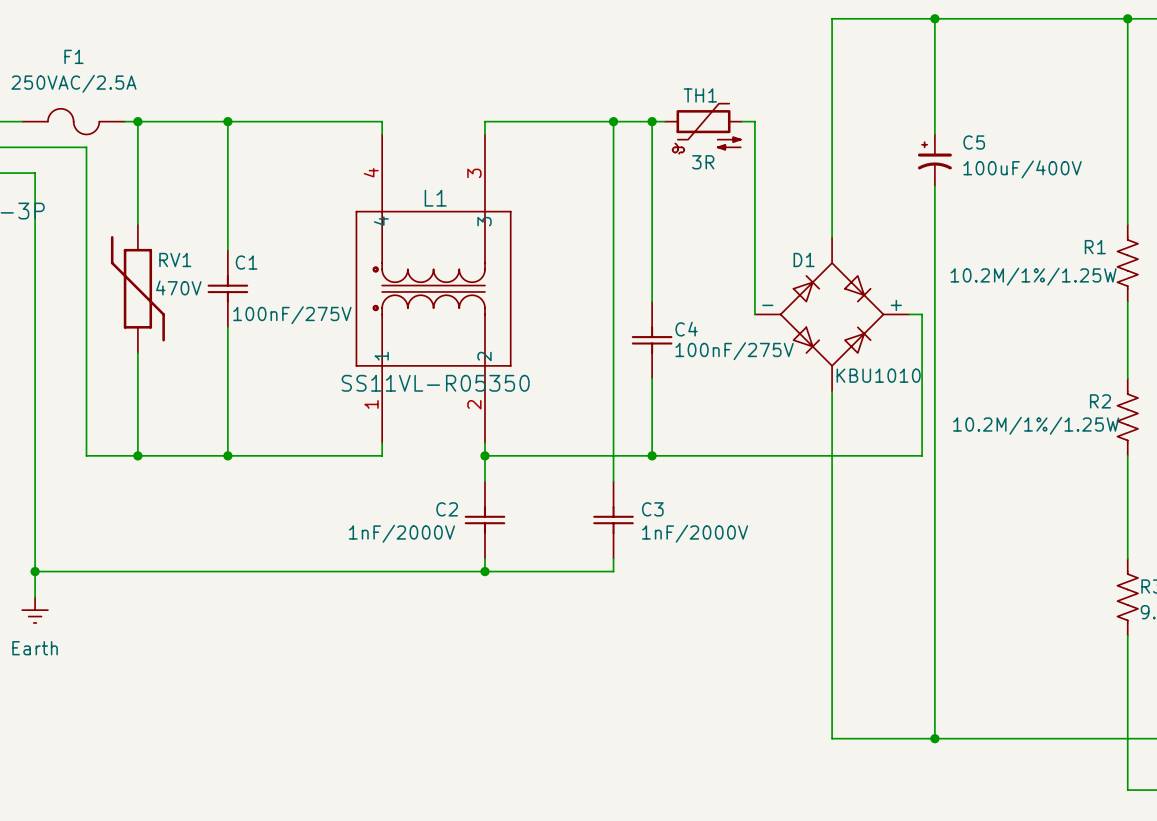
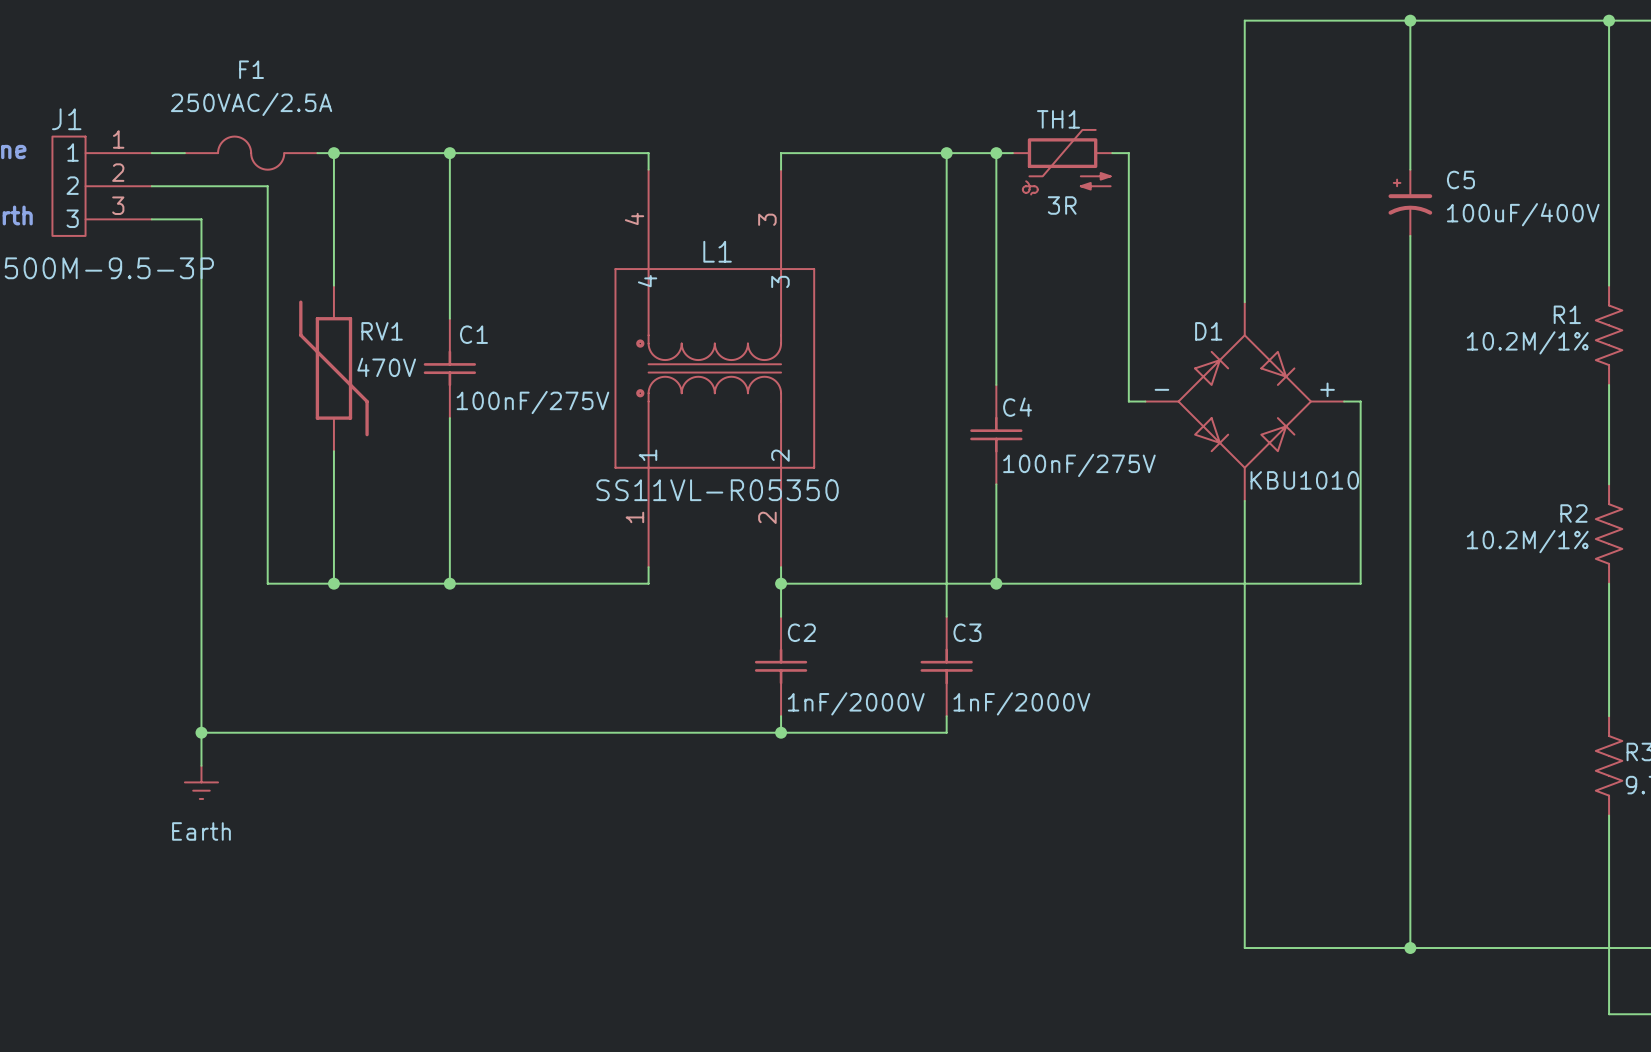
wire: (844, 18) (832, 18) (832, 237) -> (1244, 20) (1244, 302)
wire: (934, 18) (934, 134) -> (1410, 20) (1410, 169)
junction position: (934, 18) -> (1410, 20)
C5 position: (934, 160) -> (1410, 202)
wire: (934, 185) (934, 314) -> (1344, 401) (1360, 401)
wire: none -> (1410, 235) (1410, 948)
R1 value: 10.2M/1%/1.25W (1033, 276) -> 10.2M/1% (1527, 342)
D1 position: (832, 314) -> (1244, 401)
wire: (909, 314) (922, 314) (922, 455) -> (1360, 583) (1344, 583)
C4 name position: C4 (686, 329) -> C4 (1017, 407)
C4 value position: 100nF/275V (734, 351) -> 100nF/275V (1079, 465)
wire: (832, 391) (832, 738) (844, 738) -> (1244, 500) (1244, 948)
R2 value: 10.2M/1%/1.25W (1036, 425) -> 10.2M/1% (1527, 541)
wire: (934, 455) (934, 738) -> none
C2 name position: C2 (447, 509) -> C2 (801, 632)
C3 name position: C3 (652, 509) -> C3 (967, 632)
C2 value position: 1nF/2000V (401, 533) -> 1nF/2000V (856, 703)
C3 value position: 1nF/2000V (695, 533) -> 1nF/2000V (1021, 703)
junction position: (934, 738) -> (1410, 948)

